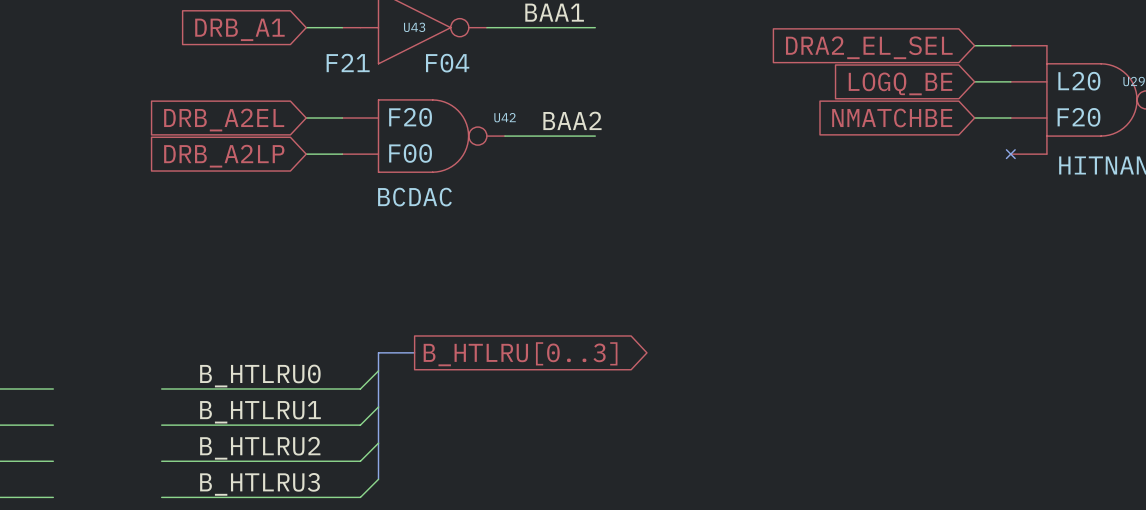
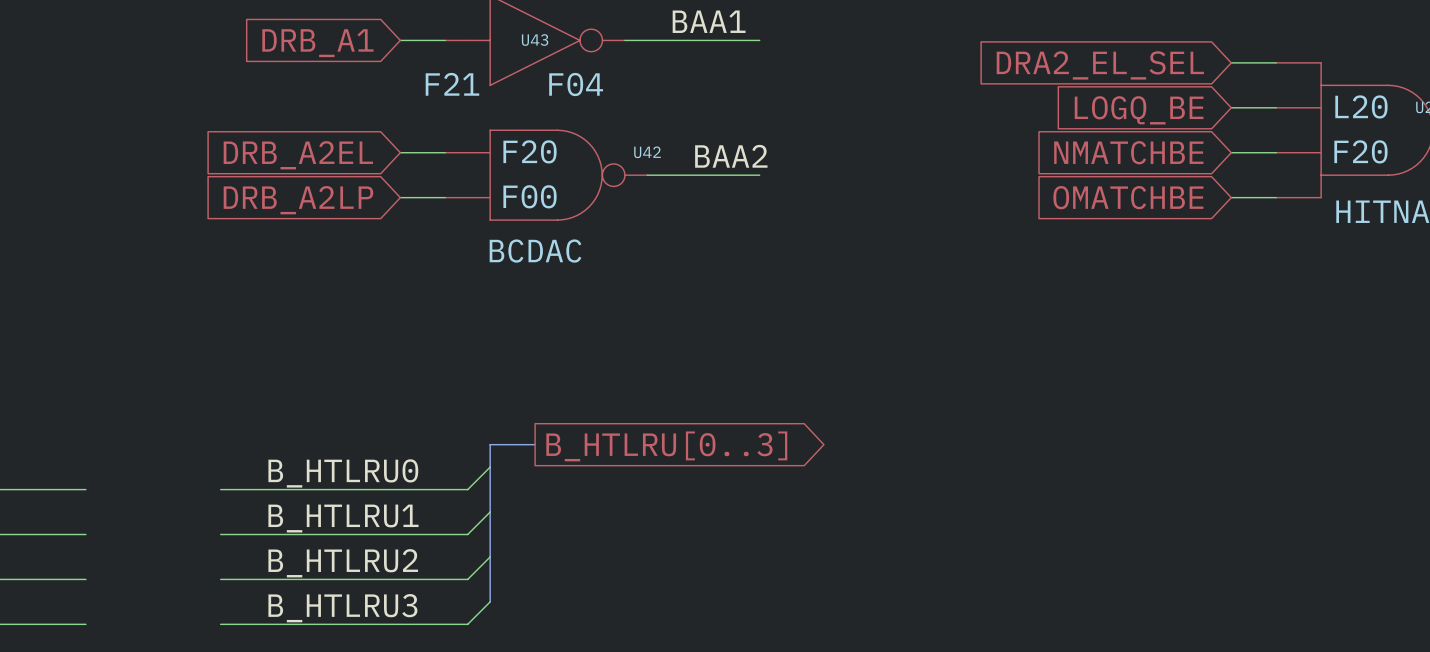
global label: none -> OMATCHBE (1128, 197)
wire: none -> (1231, 197) (1276, 197)
no-connect mark: (1010, 154) -> none

